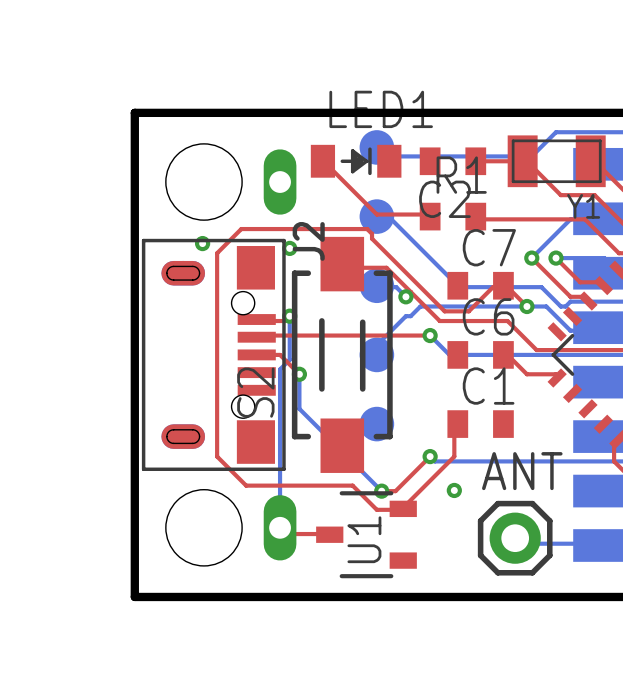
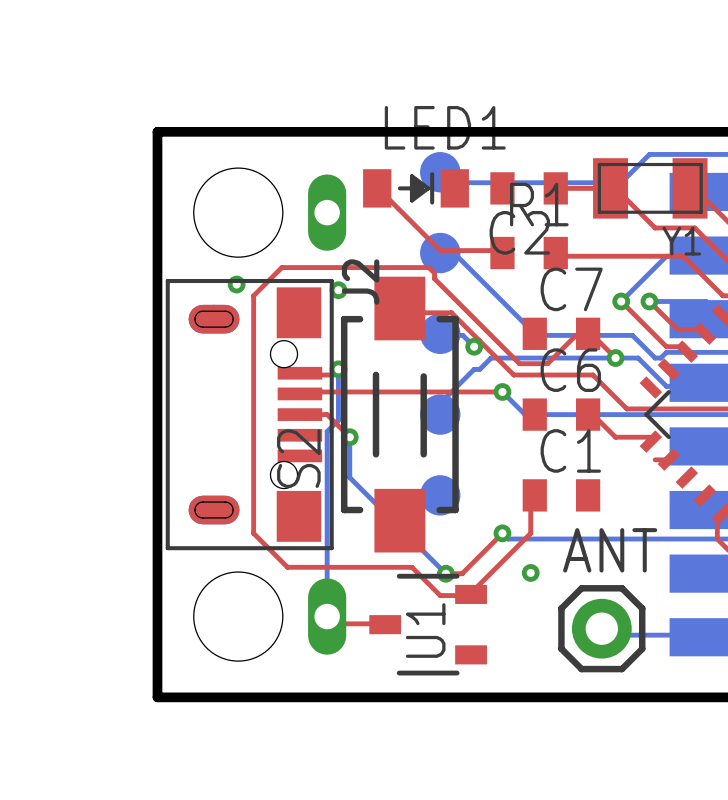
top track: none -> (655, 459) (666, 459)

